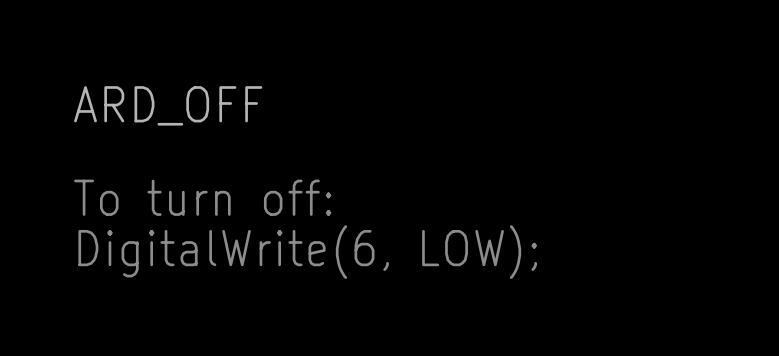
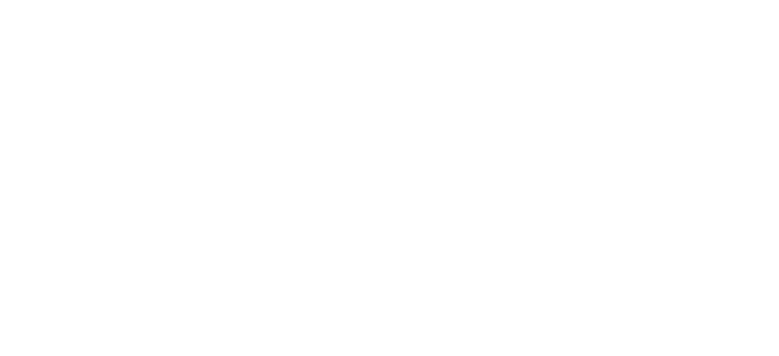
label: ARD_OFF (168, 105) -> none
text: To turn off: (202, 197) -> none
text: DigitalWrite(6, LOW); (307, 252) -> none

